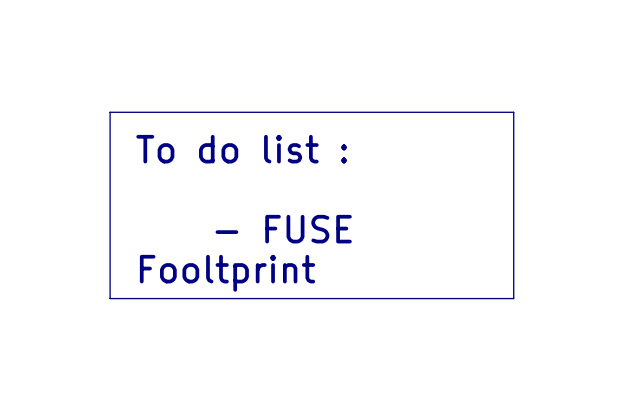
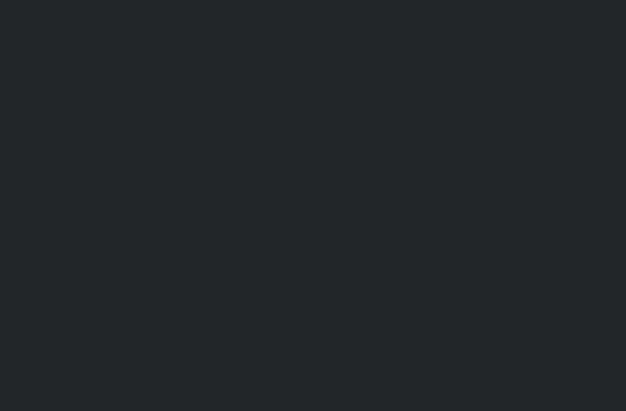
line: (110, 112) (513, 112) (513, 298) (110, 298) (110, 112) -> none
text: To do list : (241, 149) -> none
text: - FUSE (283, 229) -> none
text: Fooltprint (227, 273) -> none

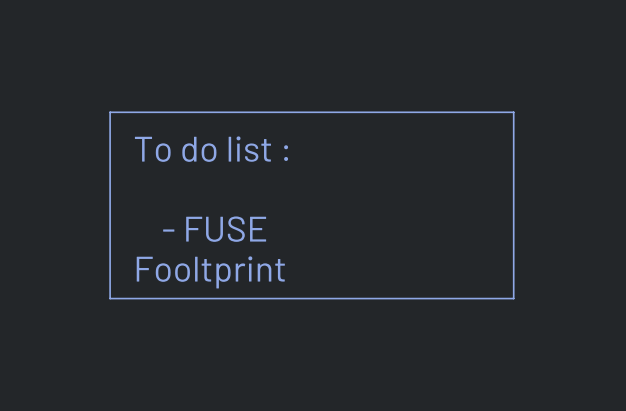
line: none -> (110, 112) (513, 112) (513, 298) (110, 298) (110, 112)
text: none -> To do list : (211, 149)
text: none -> - FUSE (214, 229)
text: none -> Fooltprint (210, 272)

